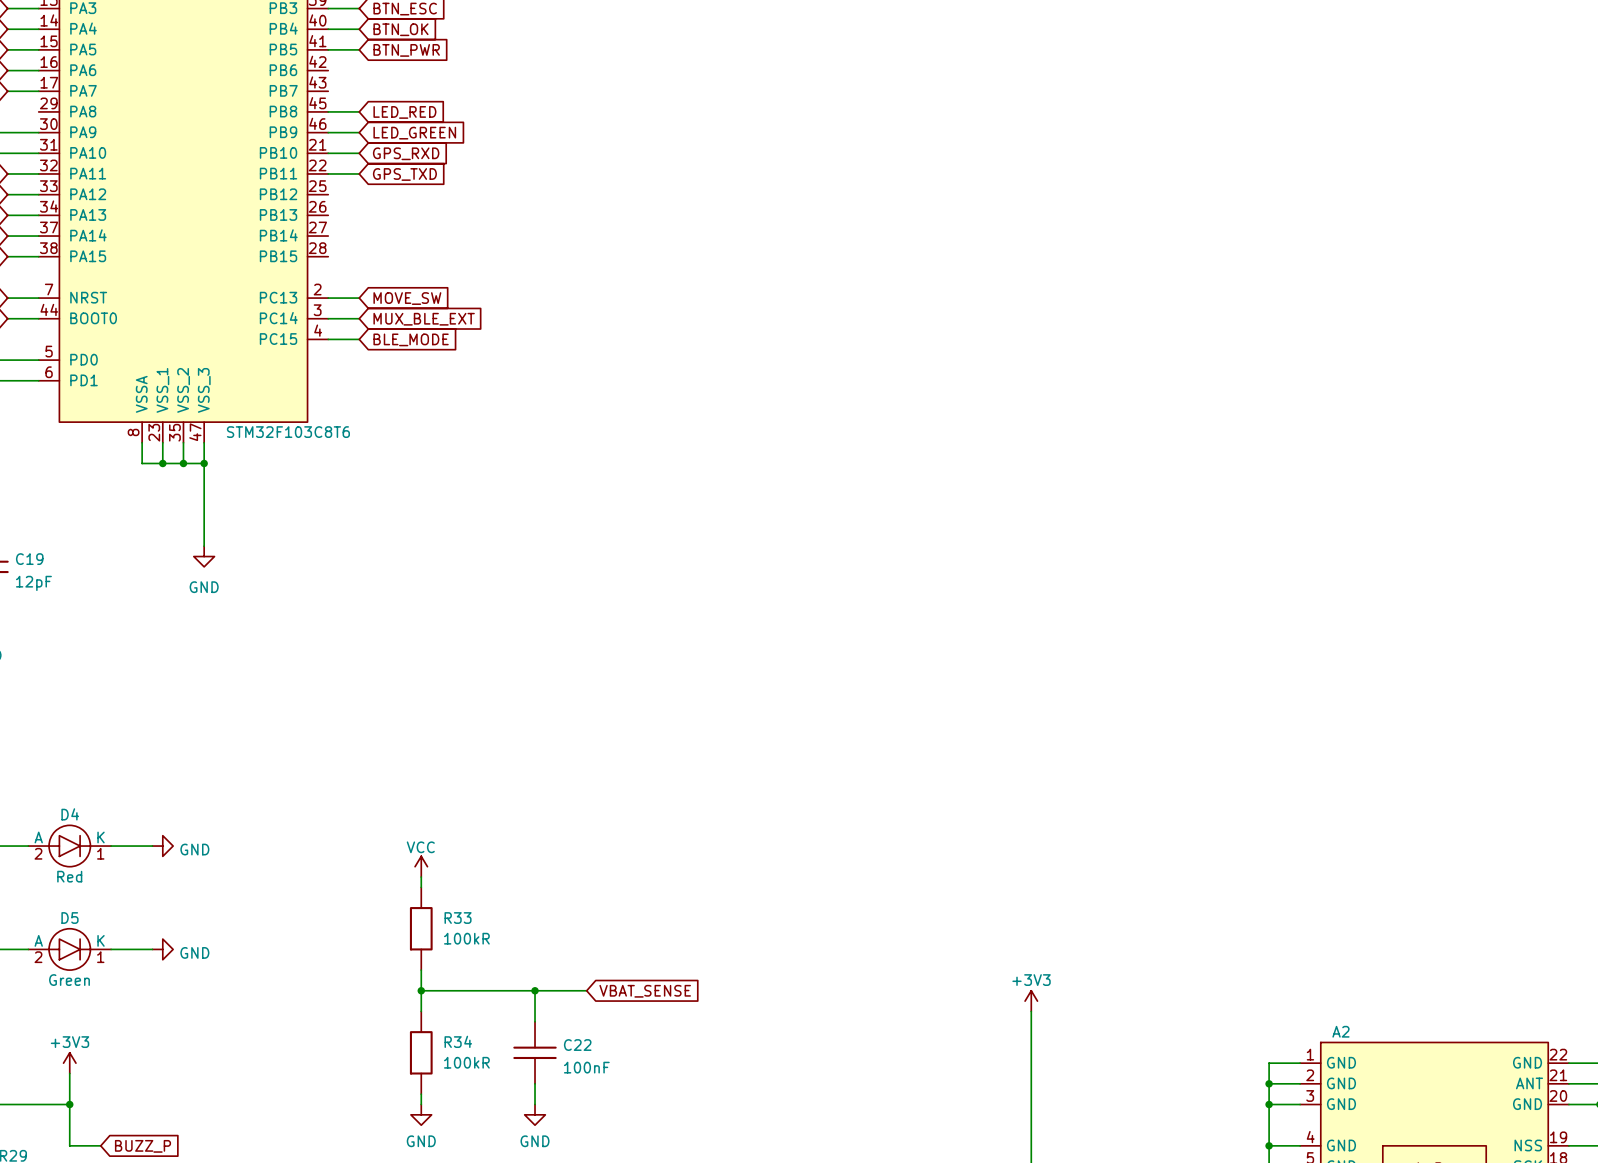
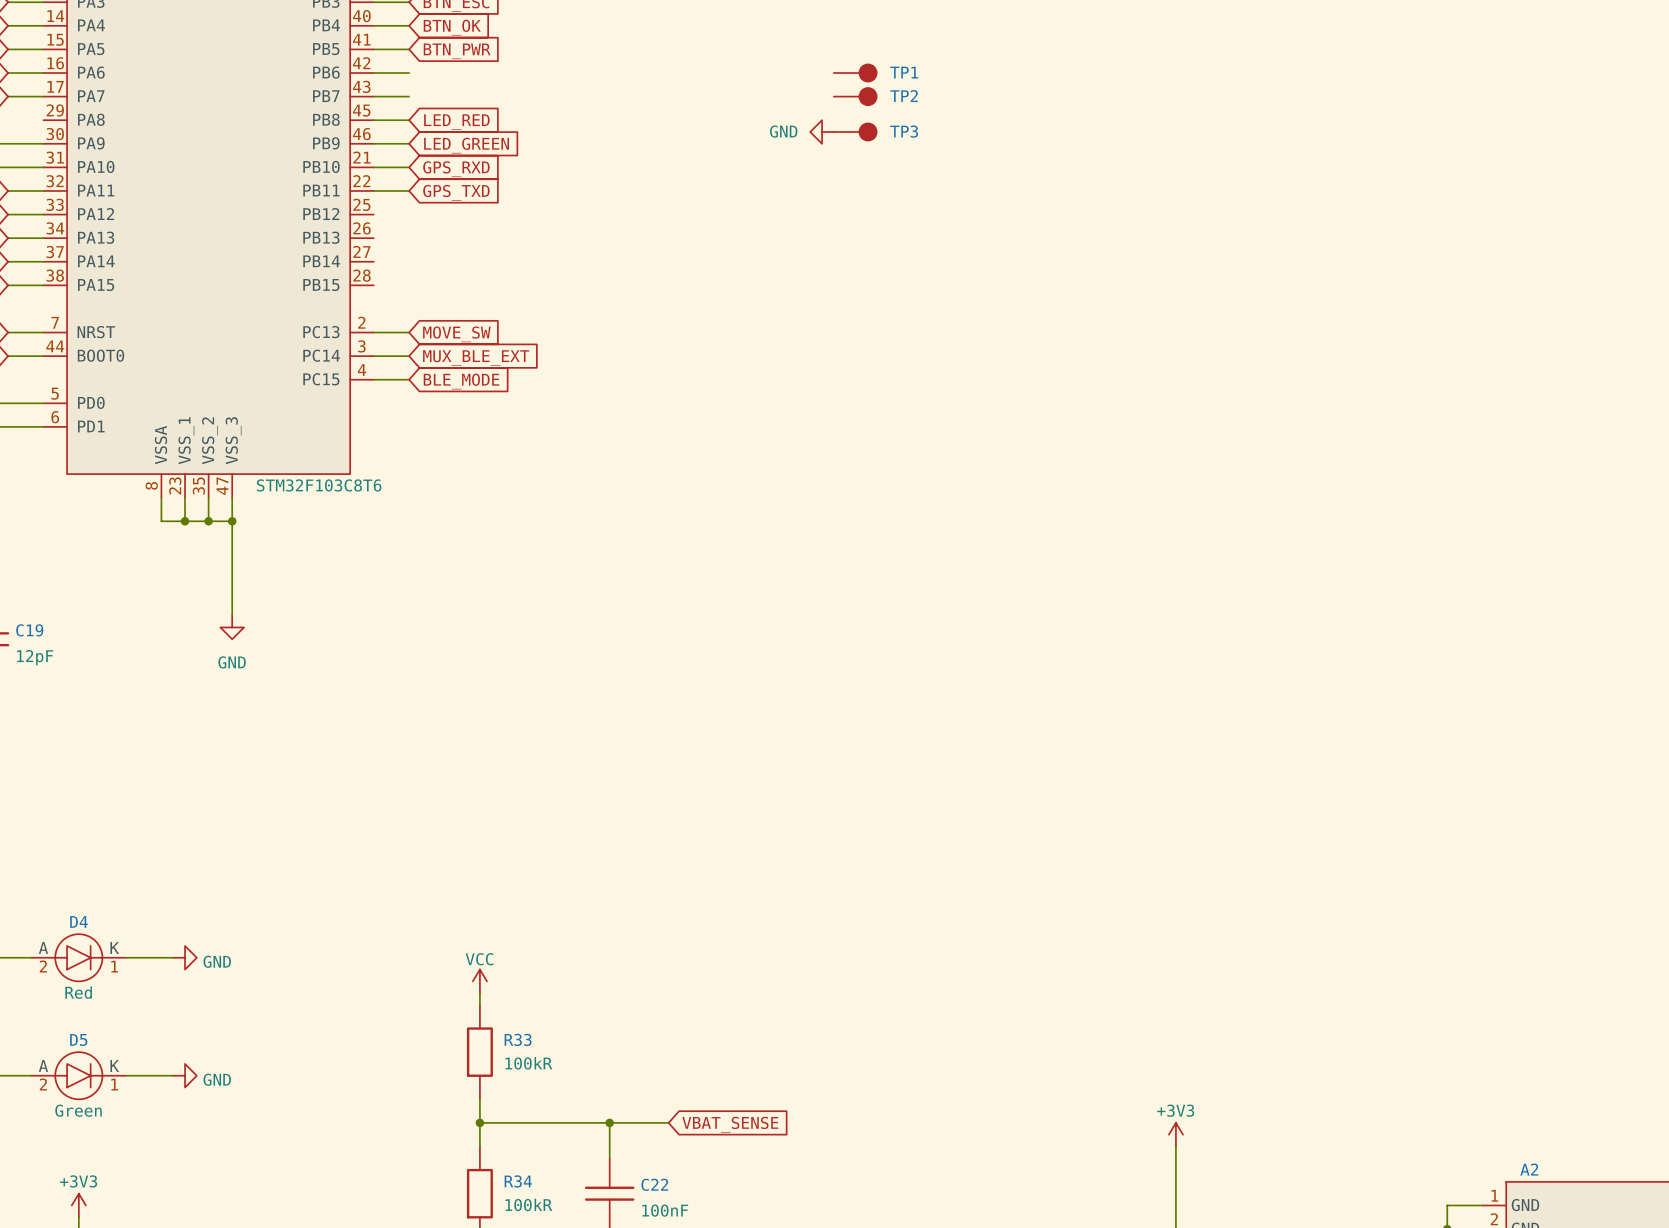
wire: none -> (373, 73) (409, 73)
TP1: none -> (855, 73)
wire: none -> (373, 96) (409, 96)
TP2: none -> (855, 96)
power symbol: none -> GND (822, 131)
TP3: none -> (855, 131)

